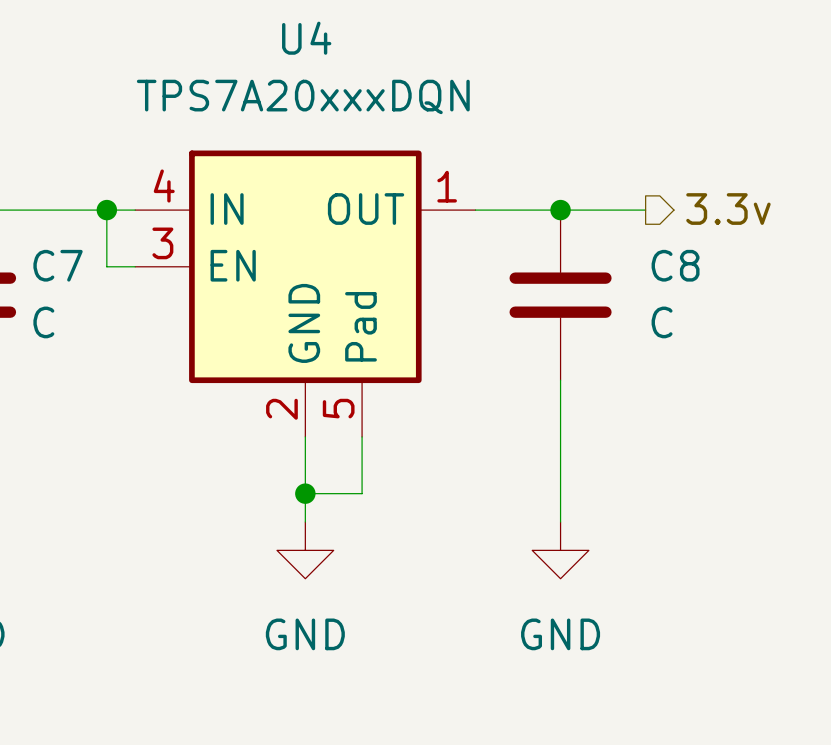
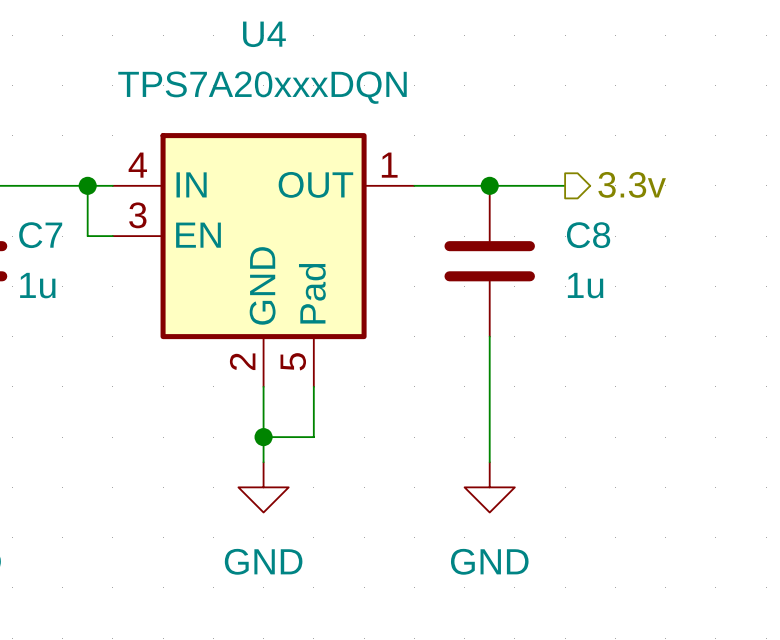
C7 value: C (43, 322) -> 1u (37, 285)
C8 value: C (662, 322) -> 1u (585, 285)

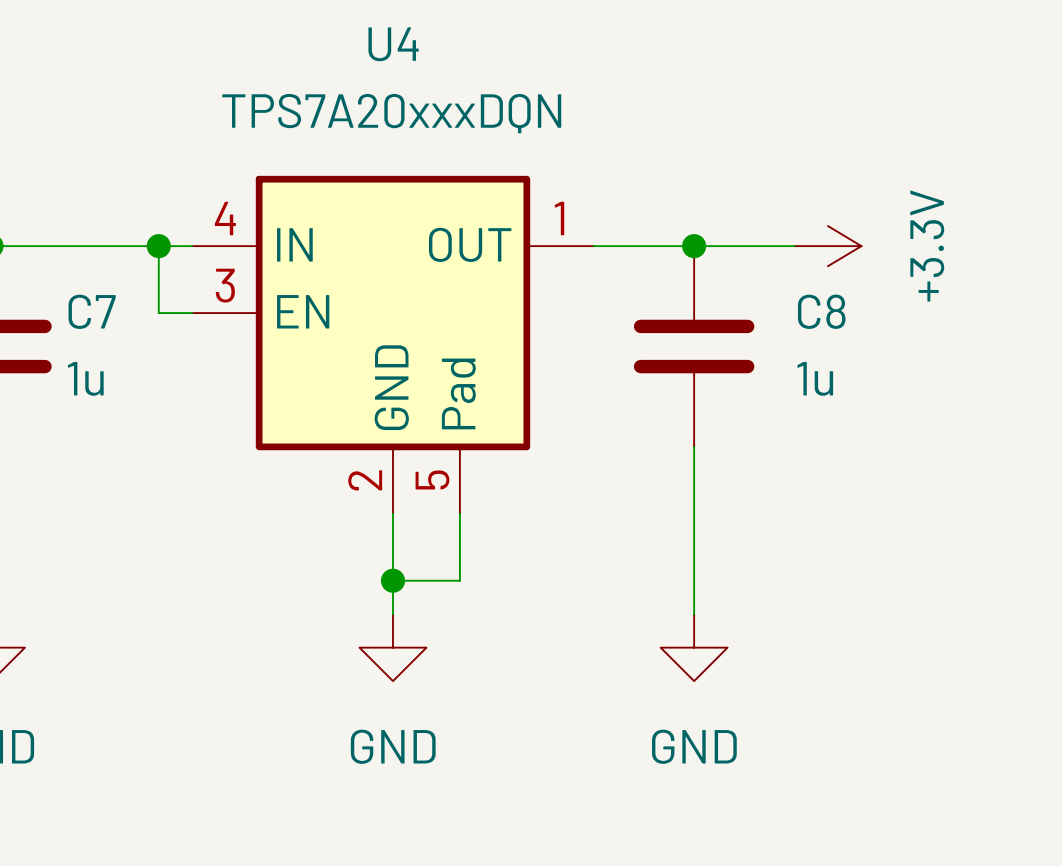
hierarchical label: 3.3v (632, 184) -> none
power symbol: none -> +3.3V (827, 246)

